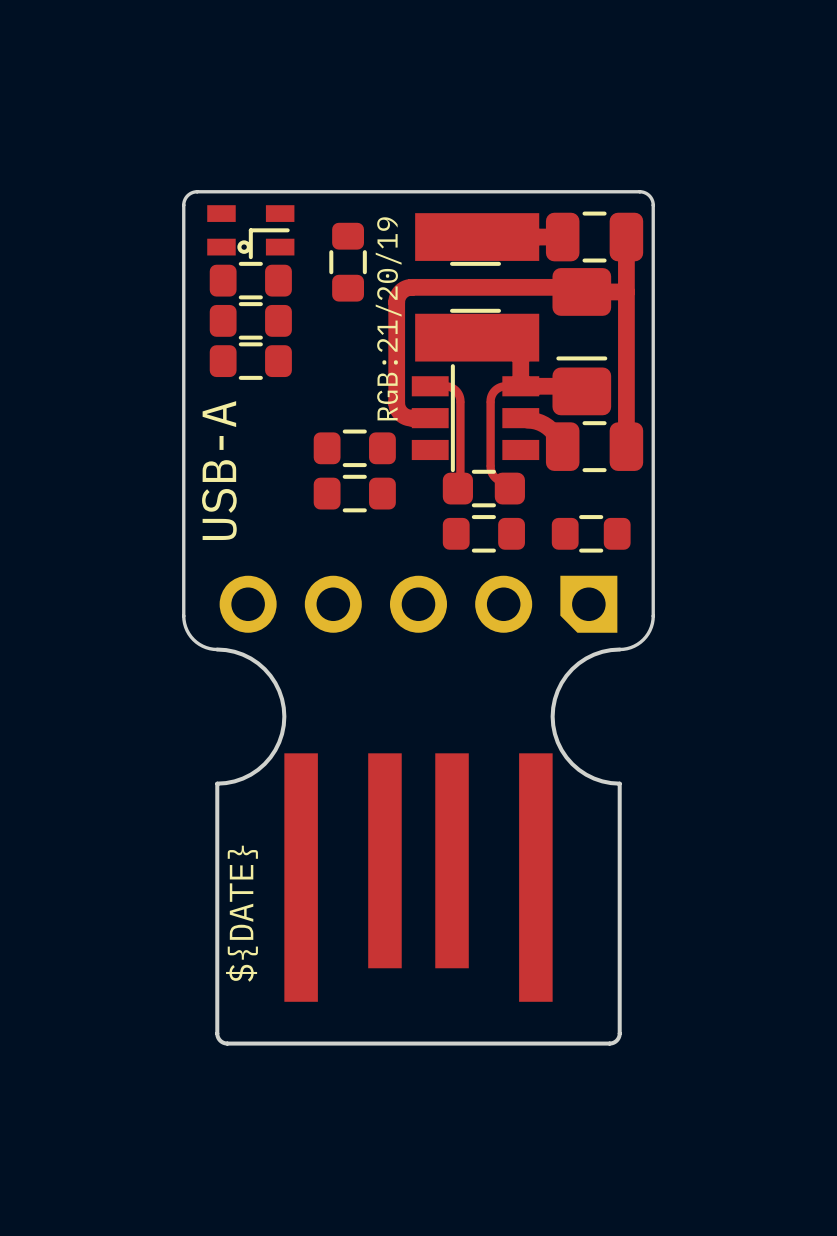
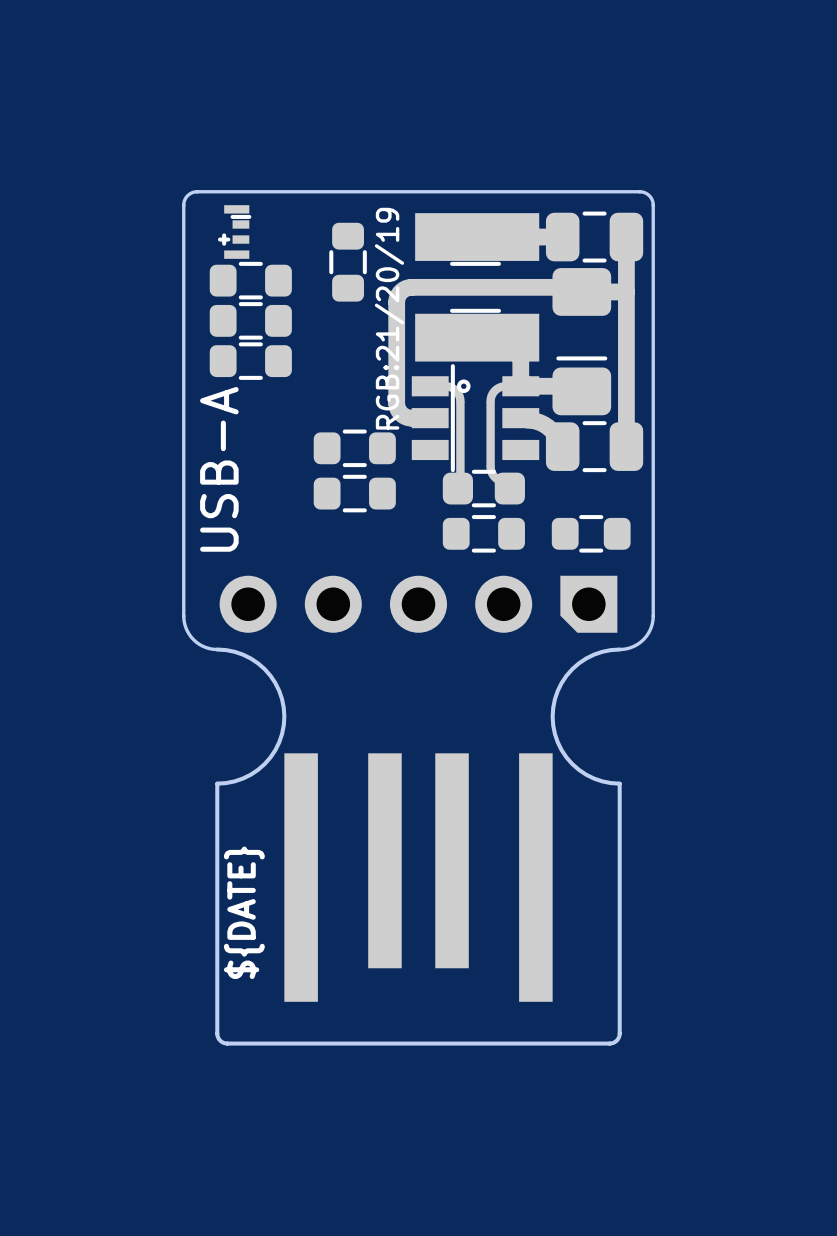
part footprint: [207, 205, 295, 260] -> [217, 205, 252, 259]
part footprint: [388, 212, 644, 505] -> [388, 212, 644, 505]

